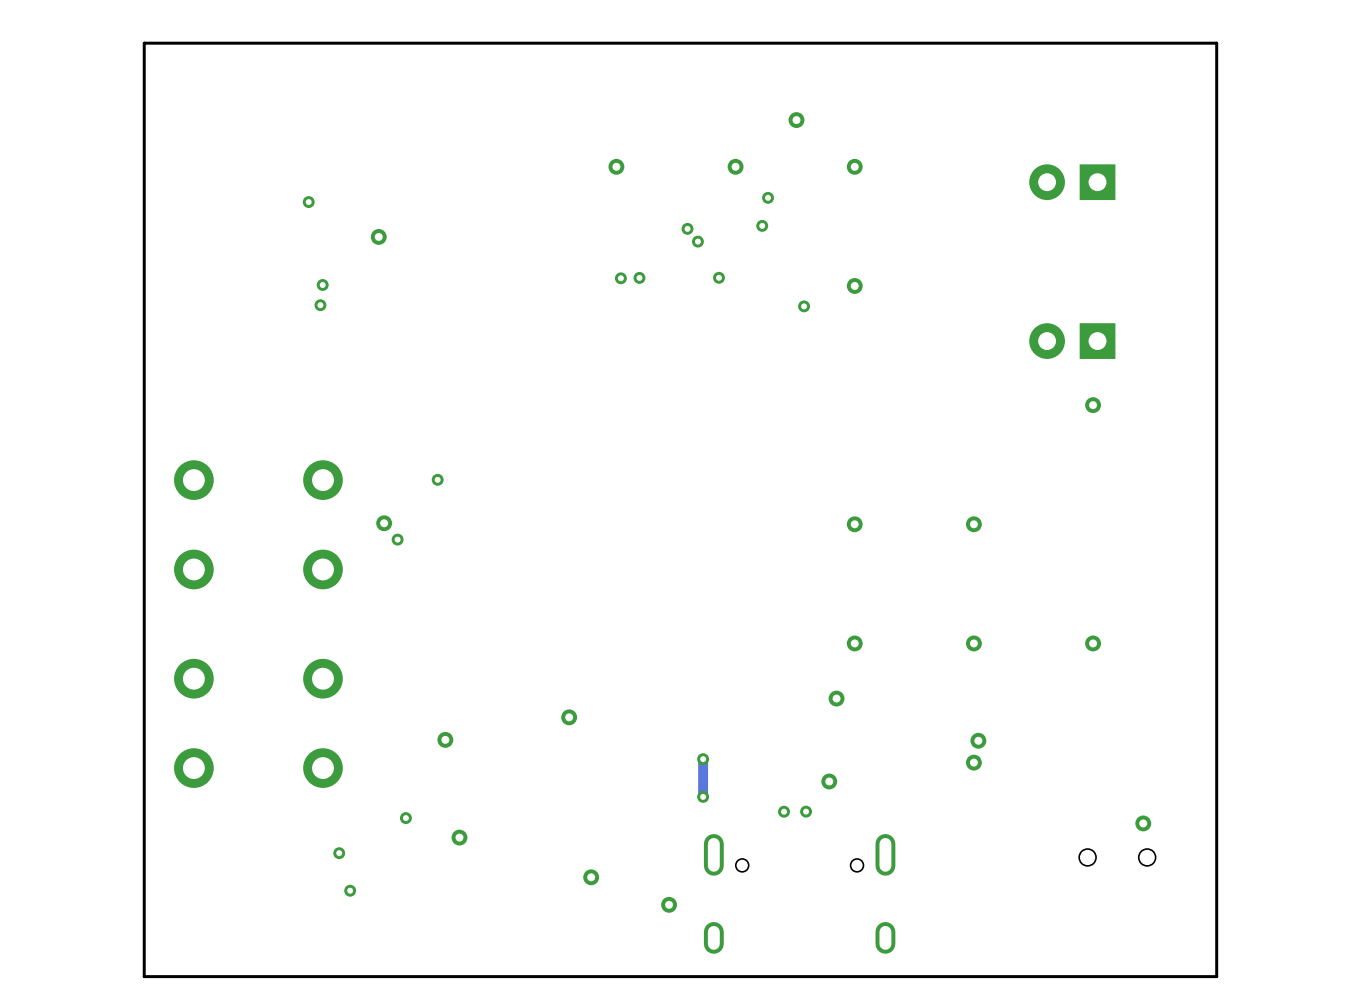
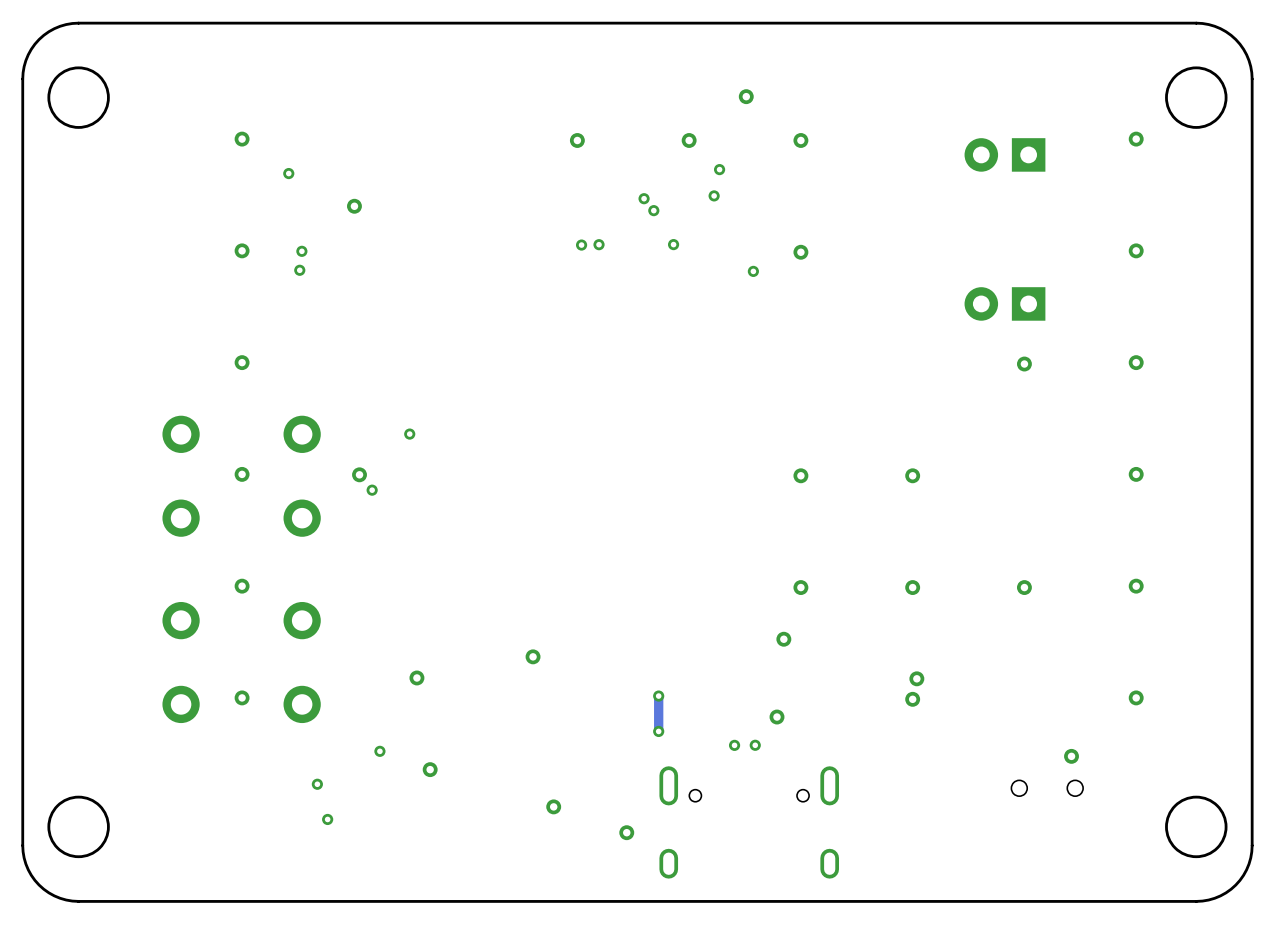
board edge: (1216, 43) (144, 43) (144, 976) (1216, 976) (1216, 43) -> (1196, 23) (1214, 26) (1235, 39) (1249, 60) (1252, 79) (1252, 845) (1246, 869) (1231, 889) (1214, 898) (1196, 901) (78, 901) (54, 895) (34, 880) (25, 864) (22, 845) (22, 79) (28, 54) (43, 35) (60, 26) (78, 23) (1196, 23)
round board edge: none -> [47, 66, 110, 129]
round board edge: none -> [1165, 66, 1228, 129]
via: none -> (242, 139)
via: none -> (1136, 139)
via: none -> (242, 250)
via: none -> (1136, 250)
via: none -> (242, 362)
via: none -> (1136, 362)
via: none -> (242, 474)
via: none -> (1136, 474)
via: none -> (242, 586)
via: none -> (1136, 586)
via: none -> (242, 697)
via: none -> (1136, 697)
round board edge: none -> [47, 795, 110, 859]
round board edge: none -> [1165, 795, 1228, 859]

